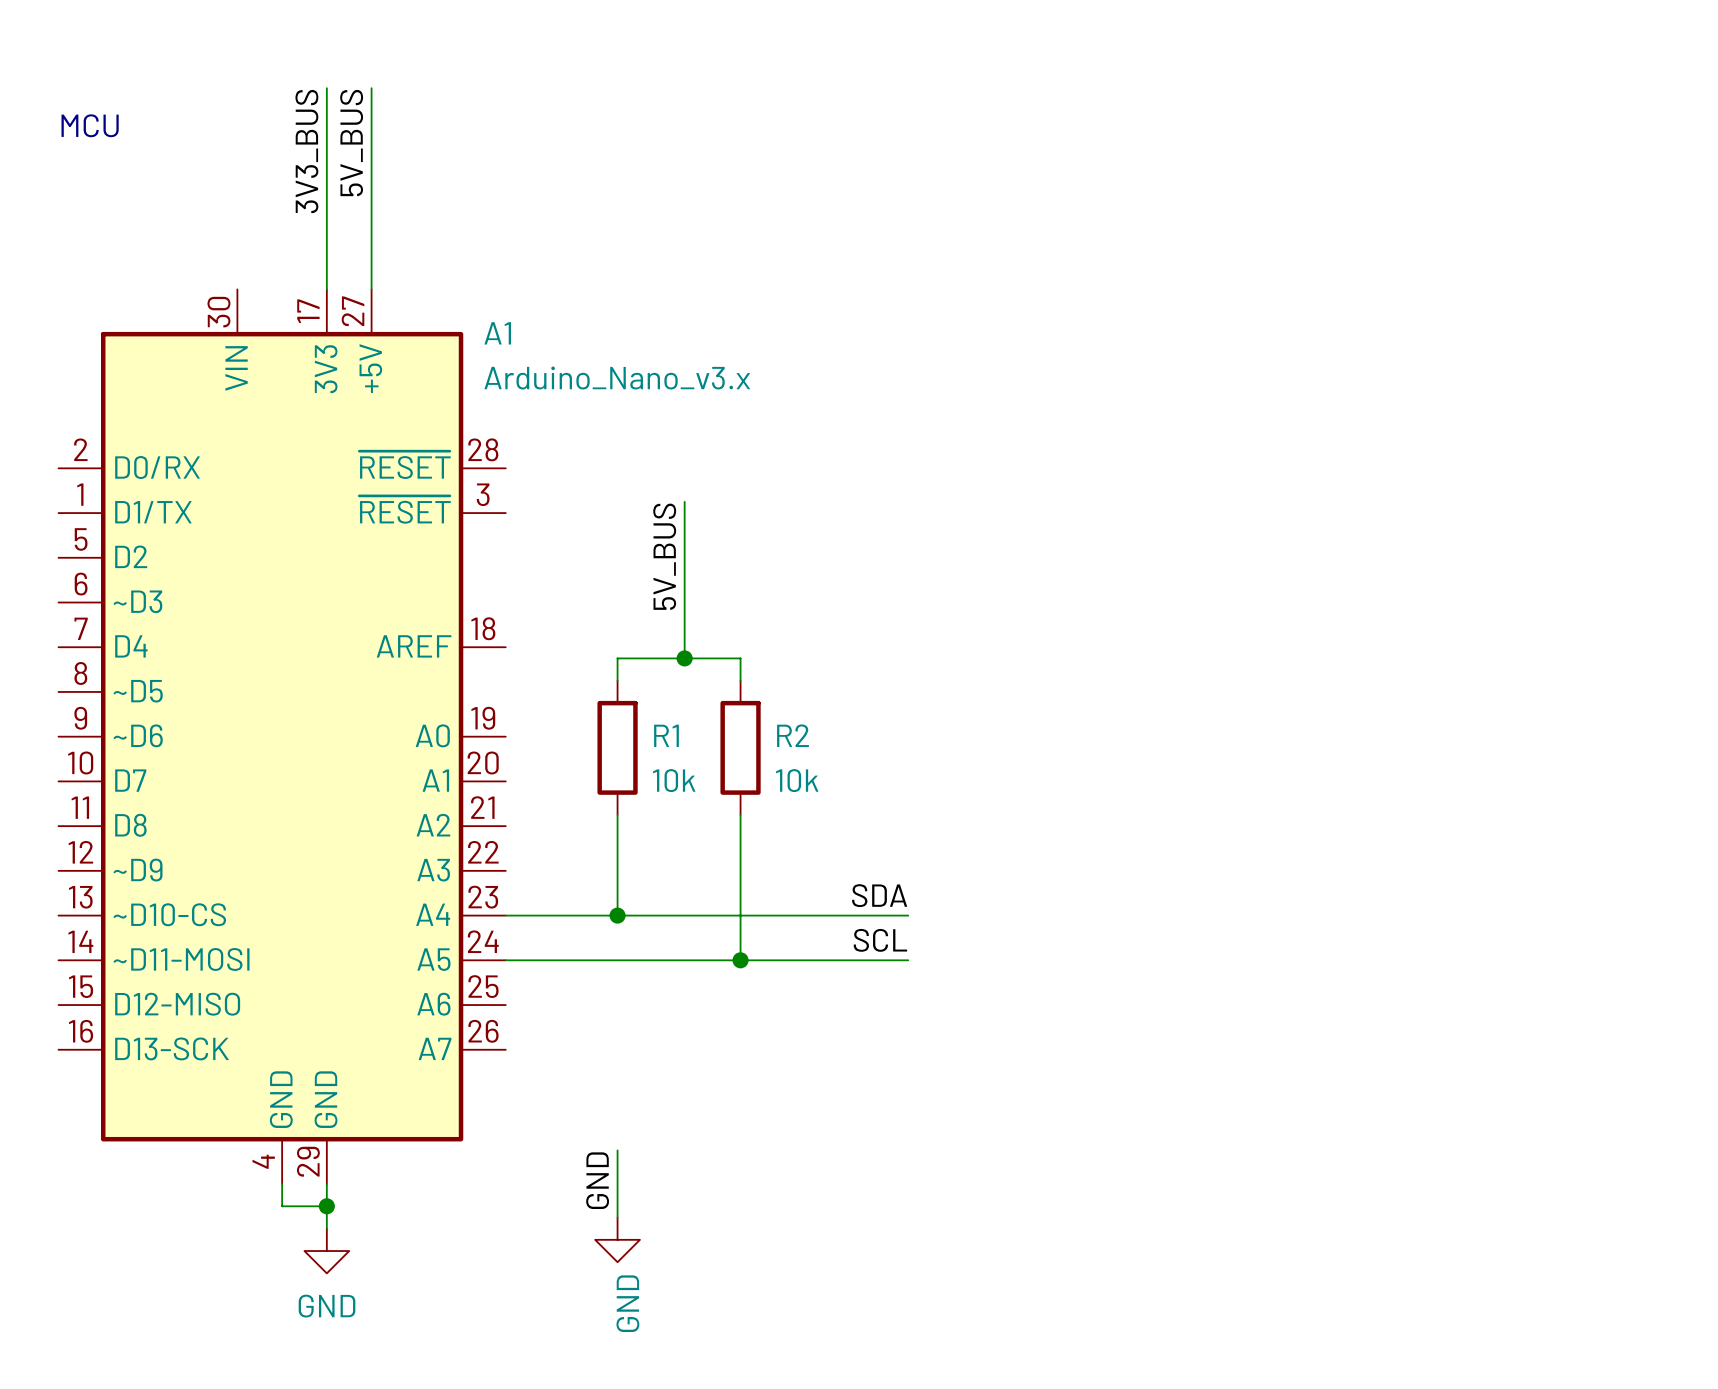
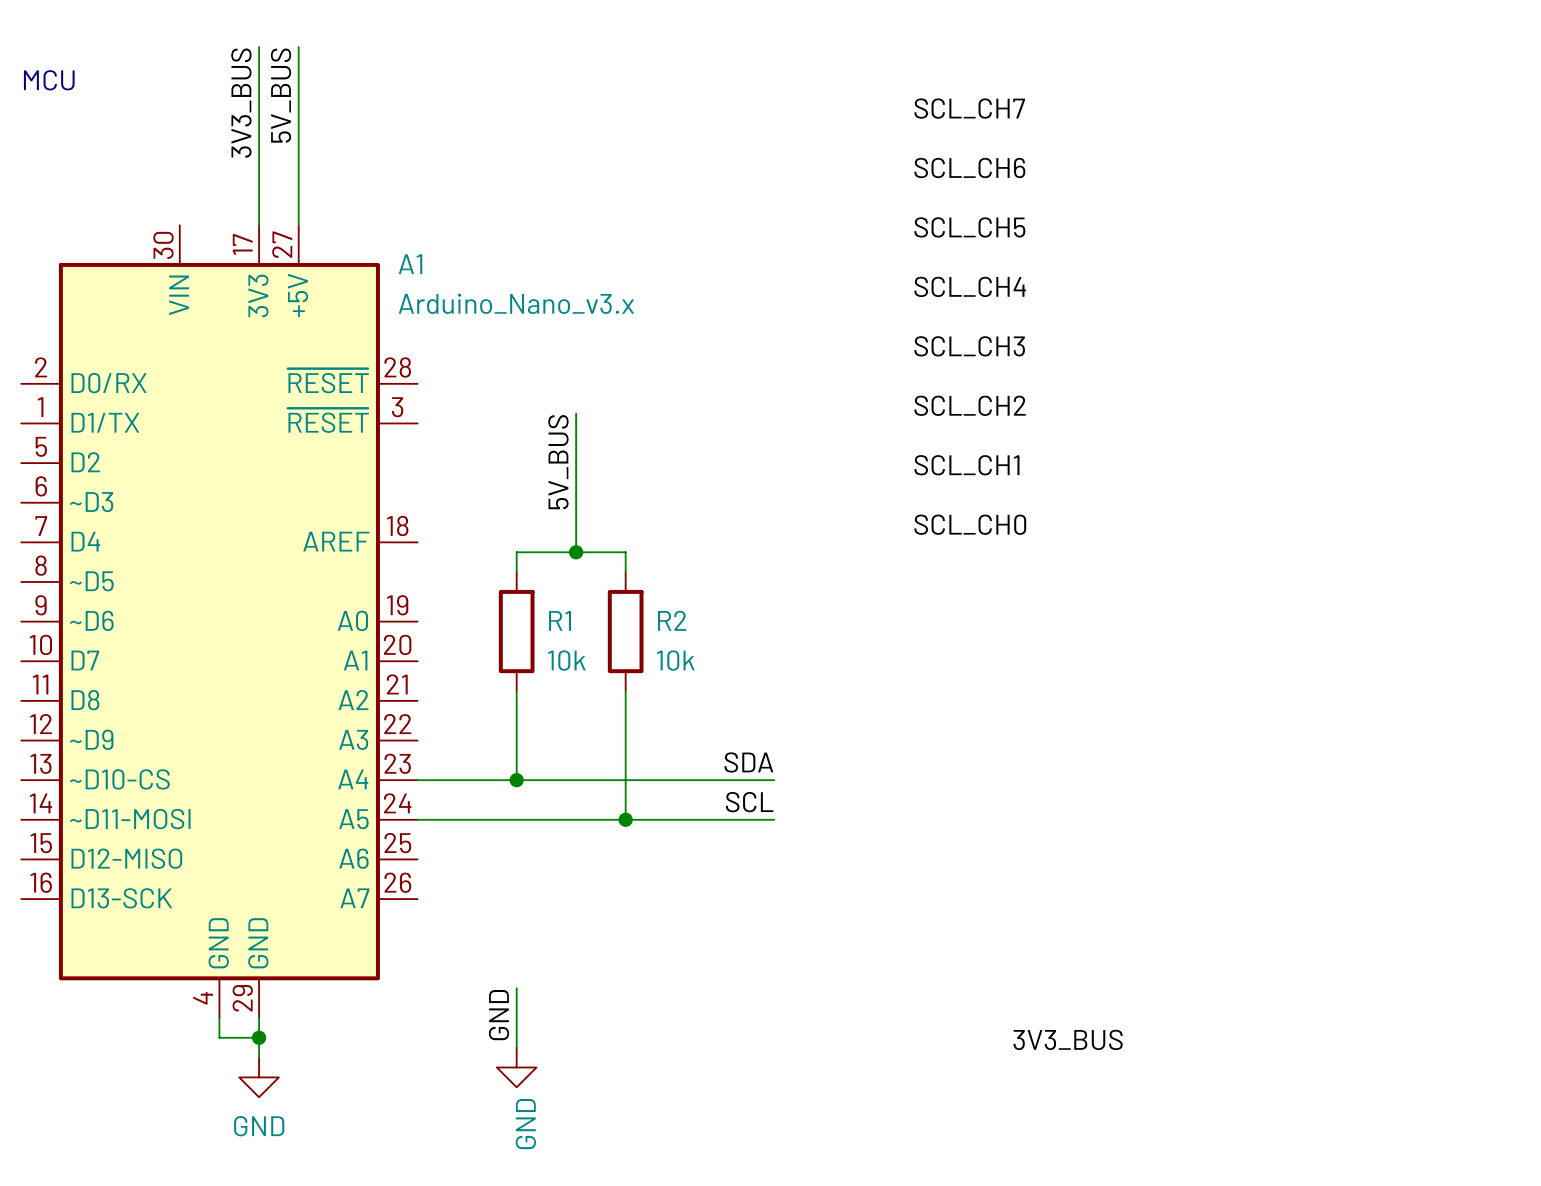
label: none -> SCL_CH7 (969, 108)
label: none -> SCL_CH6 (969, 168)
label: none -> SCL_CH5 (969, 227)
label: none -> SCL_CH4 (970, 286)
label: none -> SCL_CH3 (969, 346)
label: none -> SCL_CH2 (970, 405)
label: none -> SCL_CH1 (966, 465)
label: none -> SCL_CH0 (970, 524)
label: none -> 3V3_BUS (1068, 1039)

